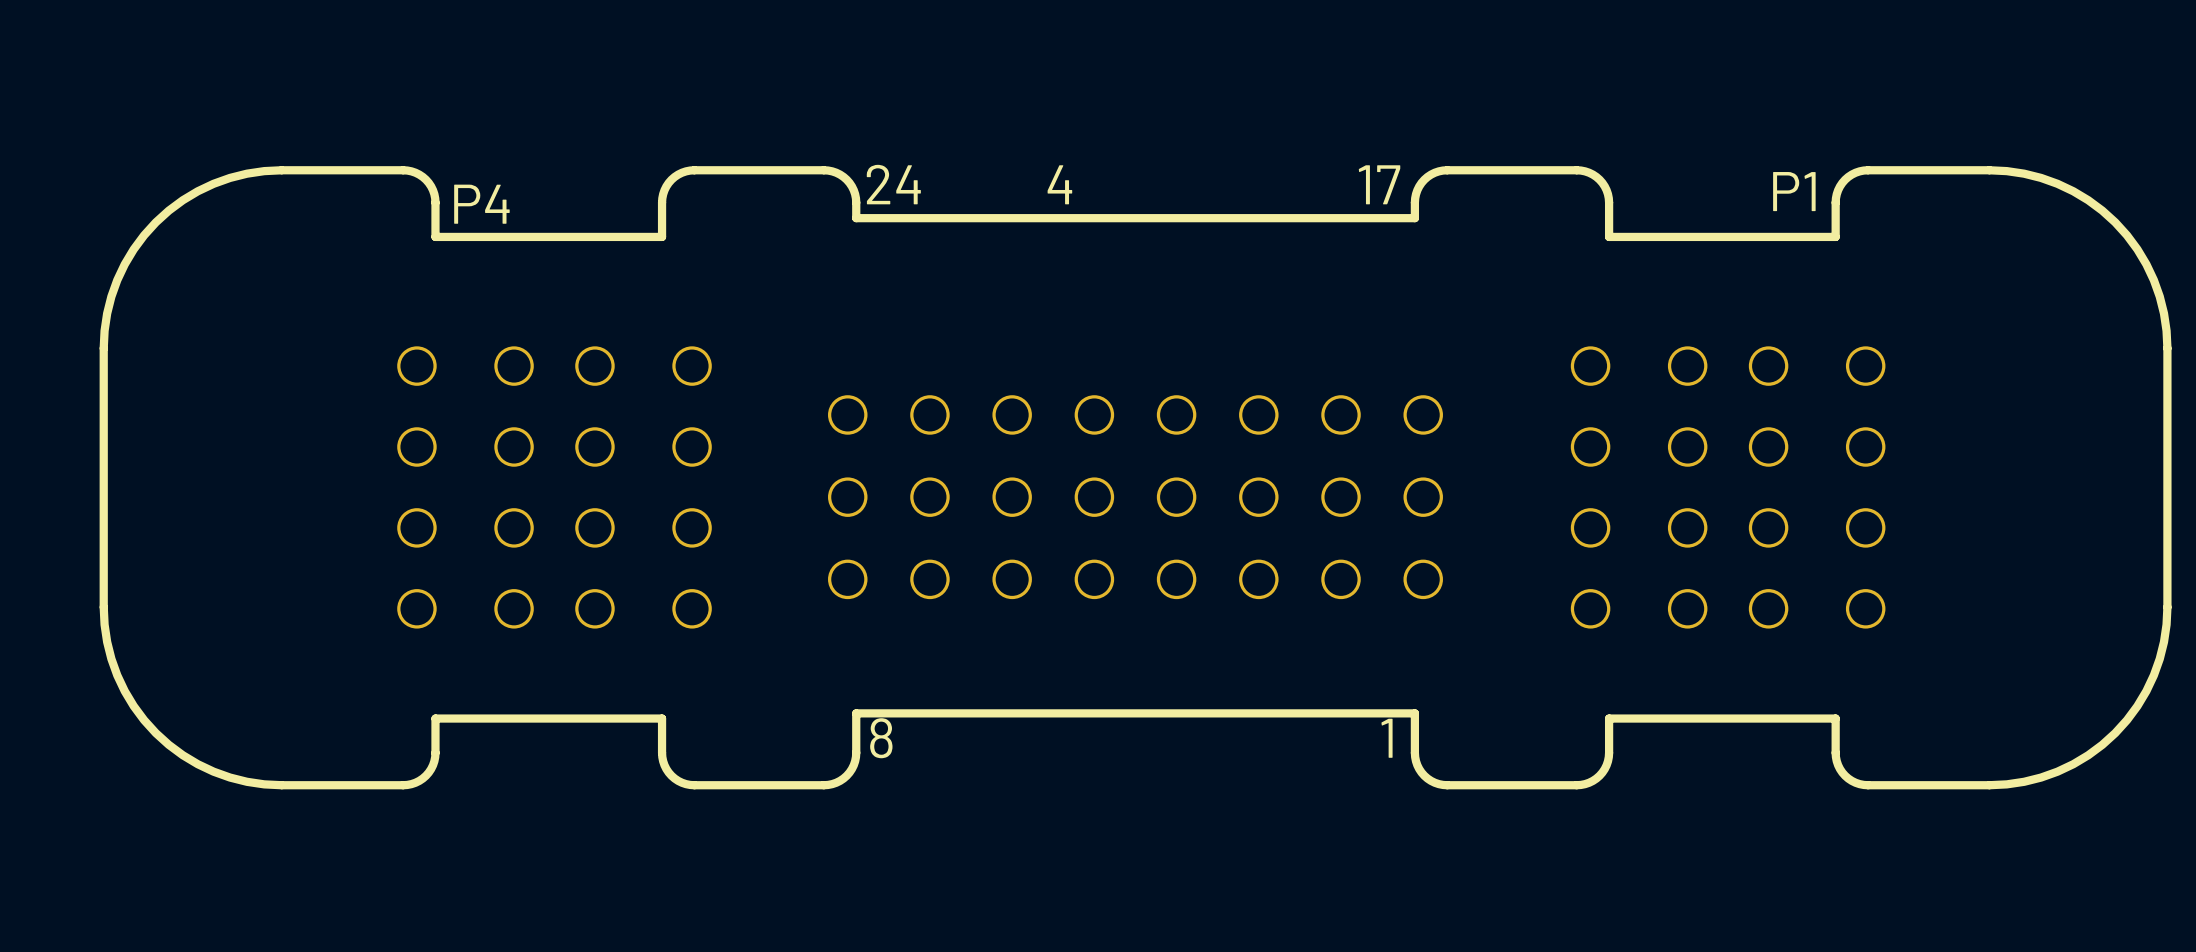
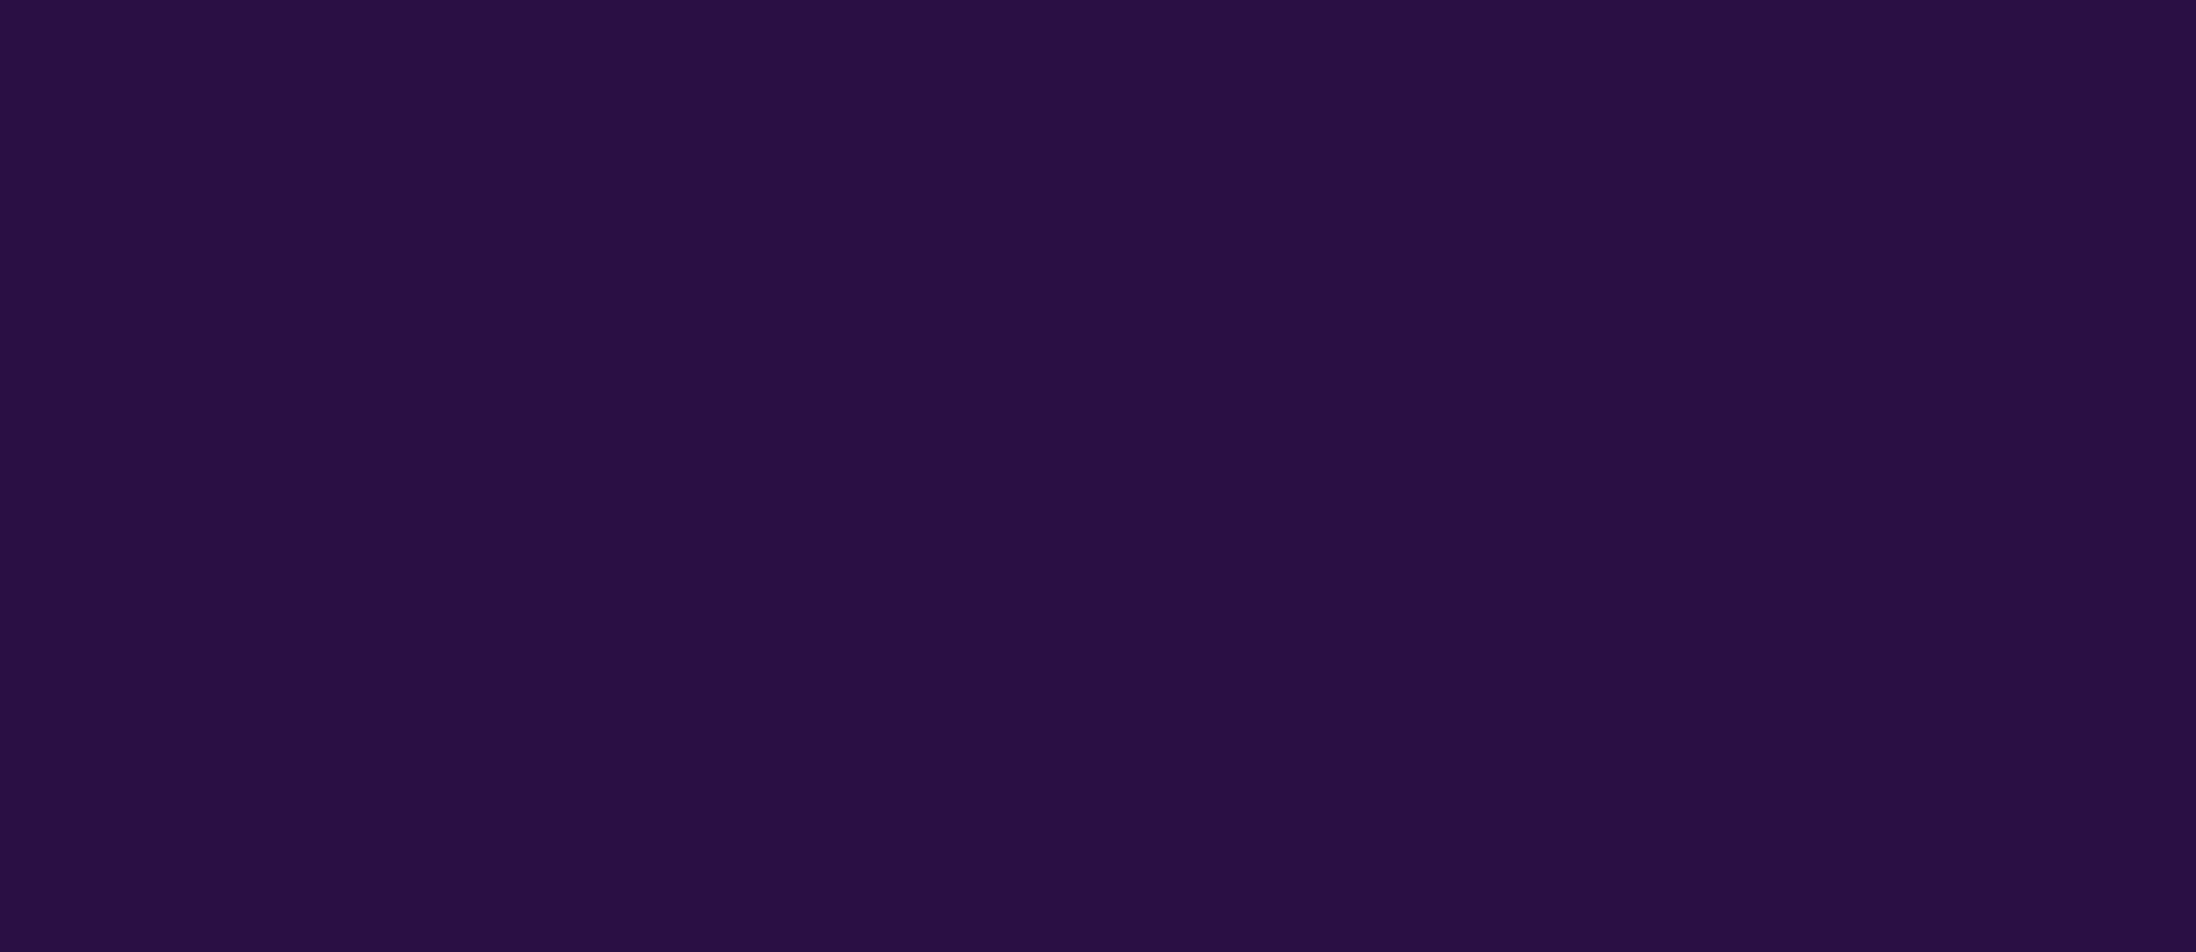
4: (1135, 477) -> none

